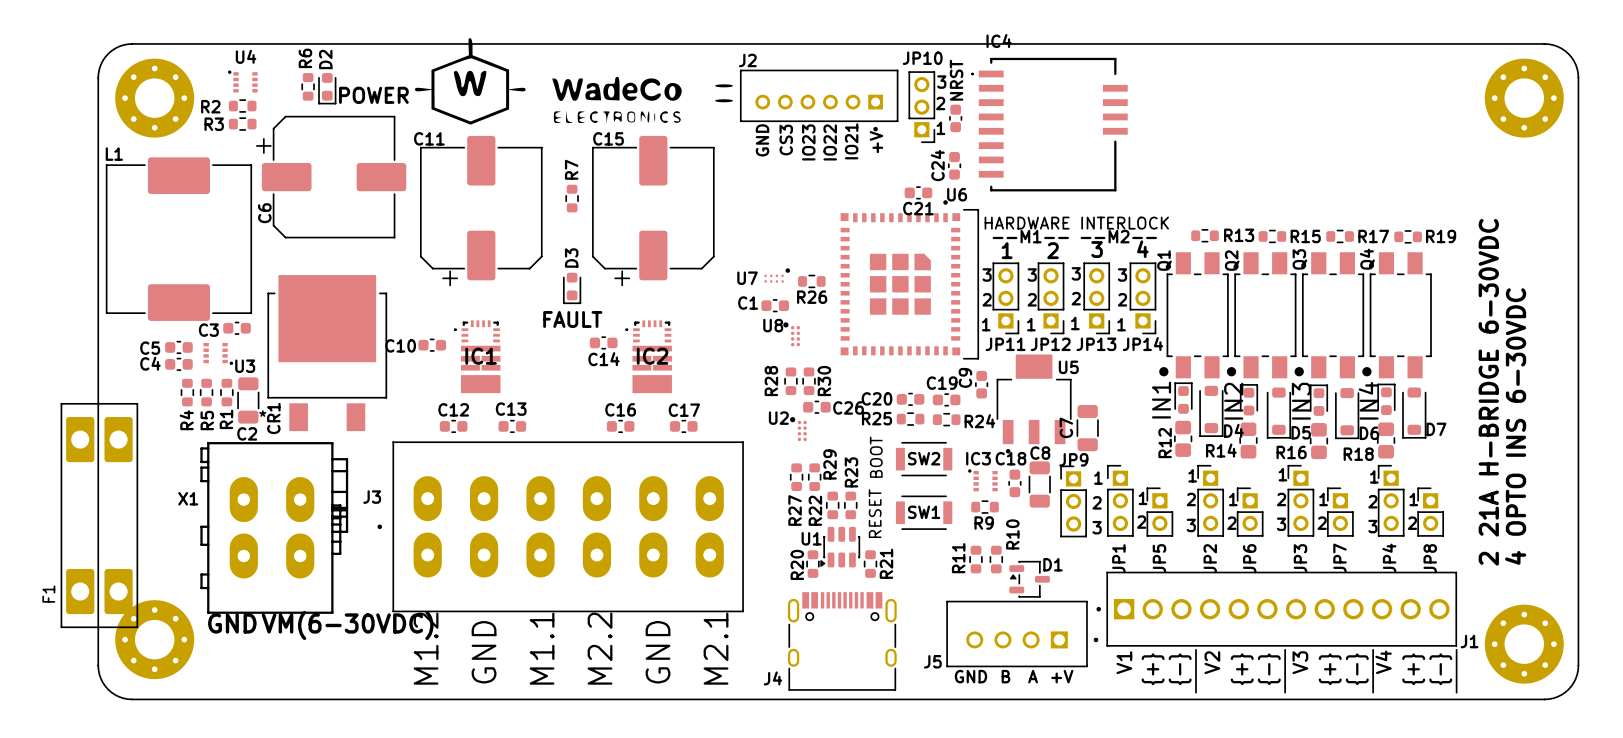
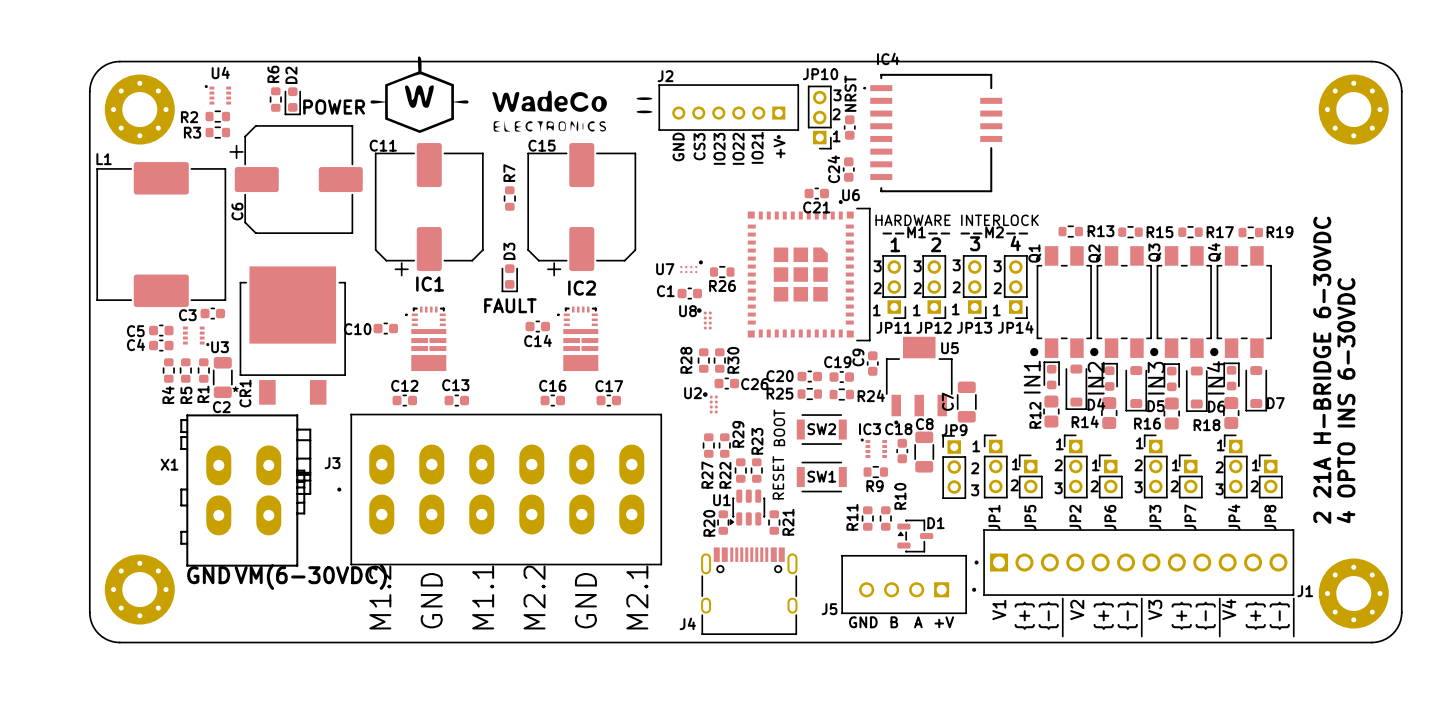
IC1 name position: IC1 (481, 356) -> IC1 (430, 284)
IC2 name position: IC2 (652, 356) -> IC2 (582, 288)
F1: (99, 515) -> none

